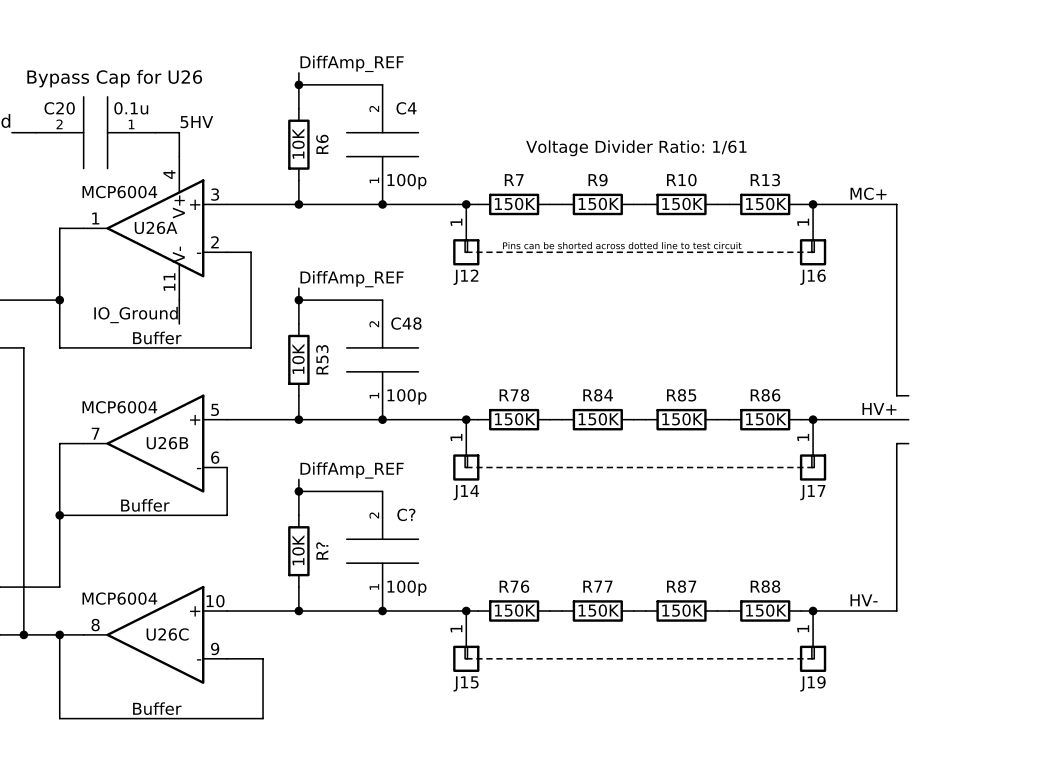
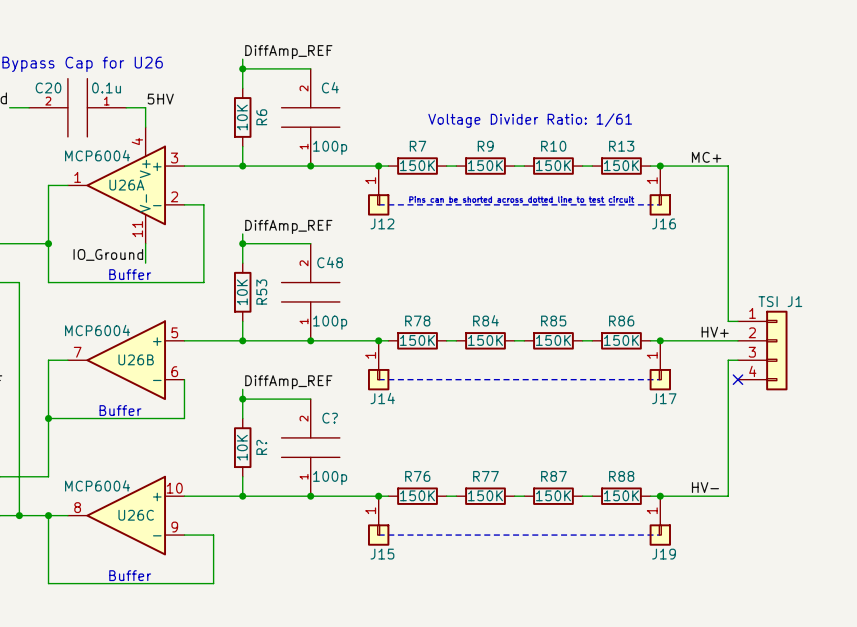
part: none -> TSI J1 (762, 350)
no-connect mark: none -> (737, 379)

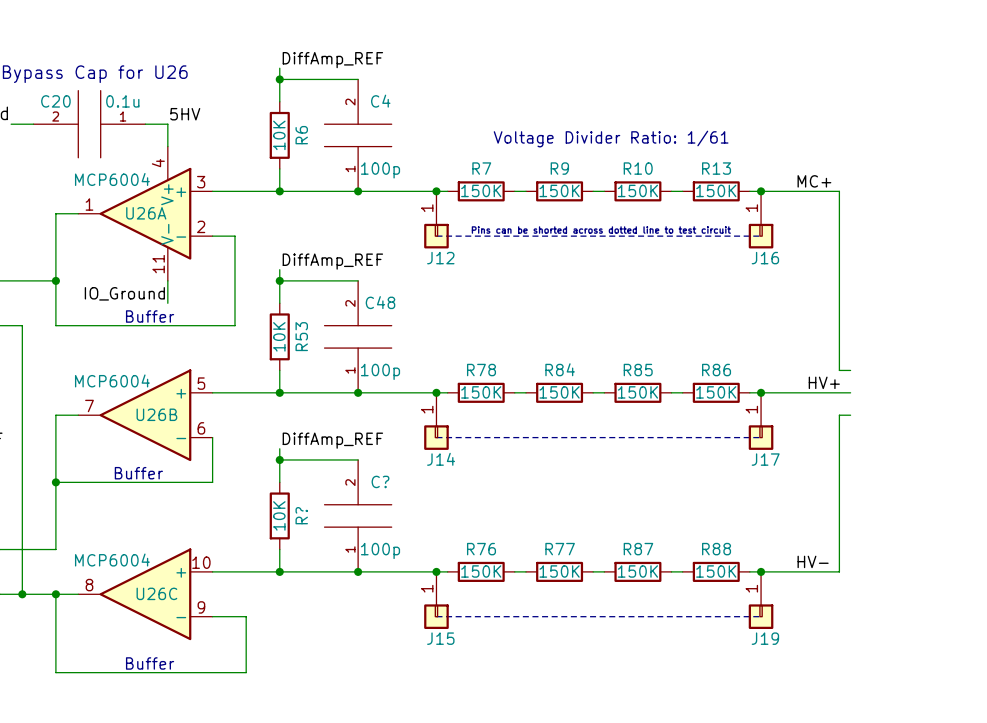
part: TSI J1 (762, 350) -> none
no-connect mark: (737, 379) -> none

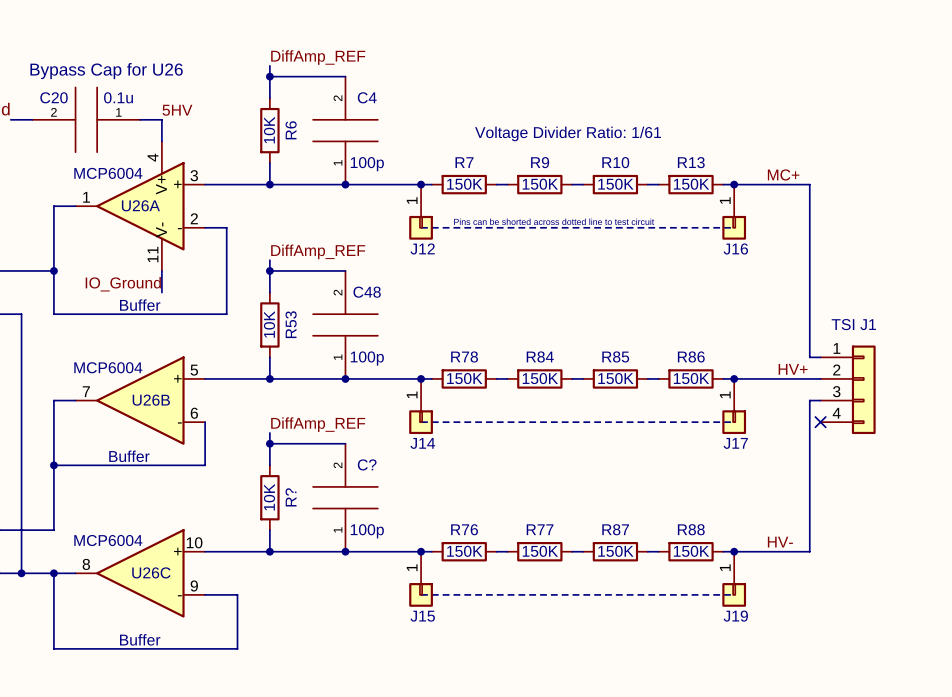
part: none -> TSI J1 (848, 389)
no-connect mark: none -> (820, 422)

